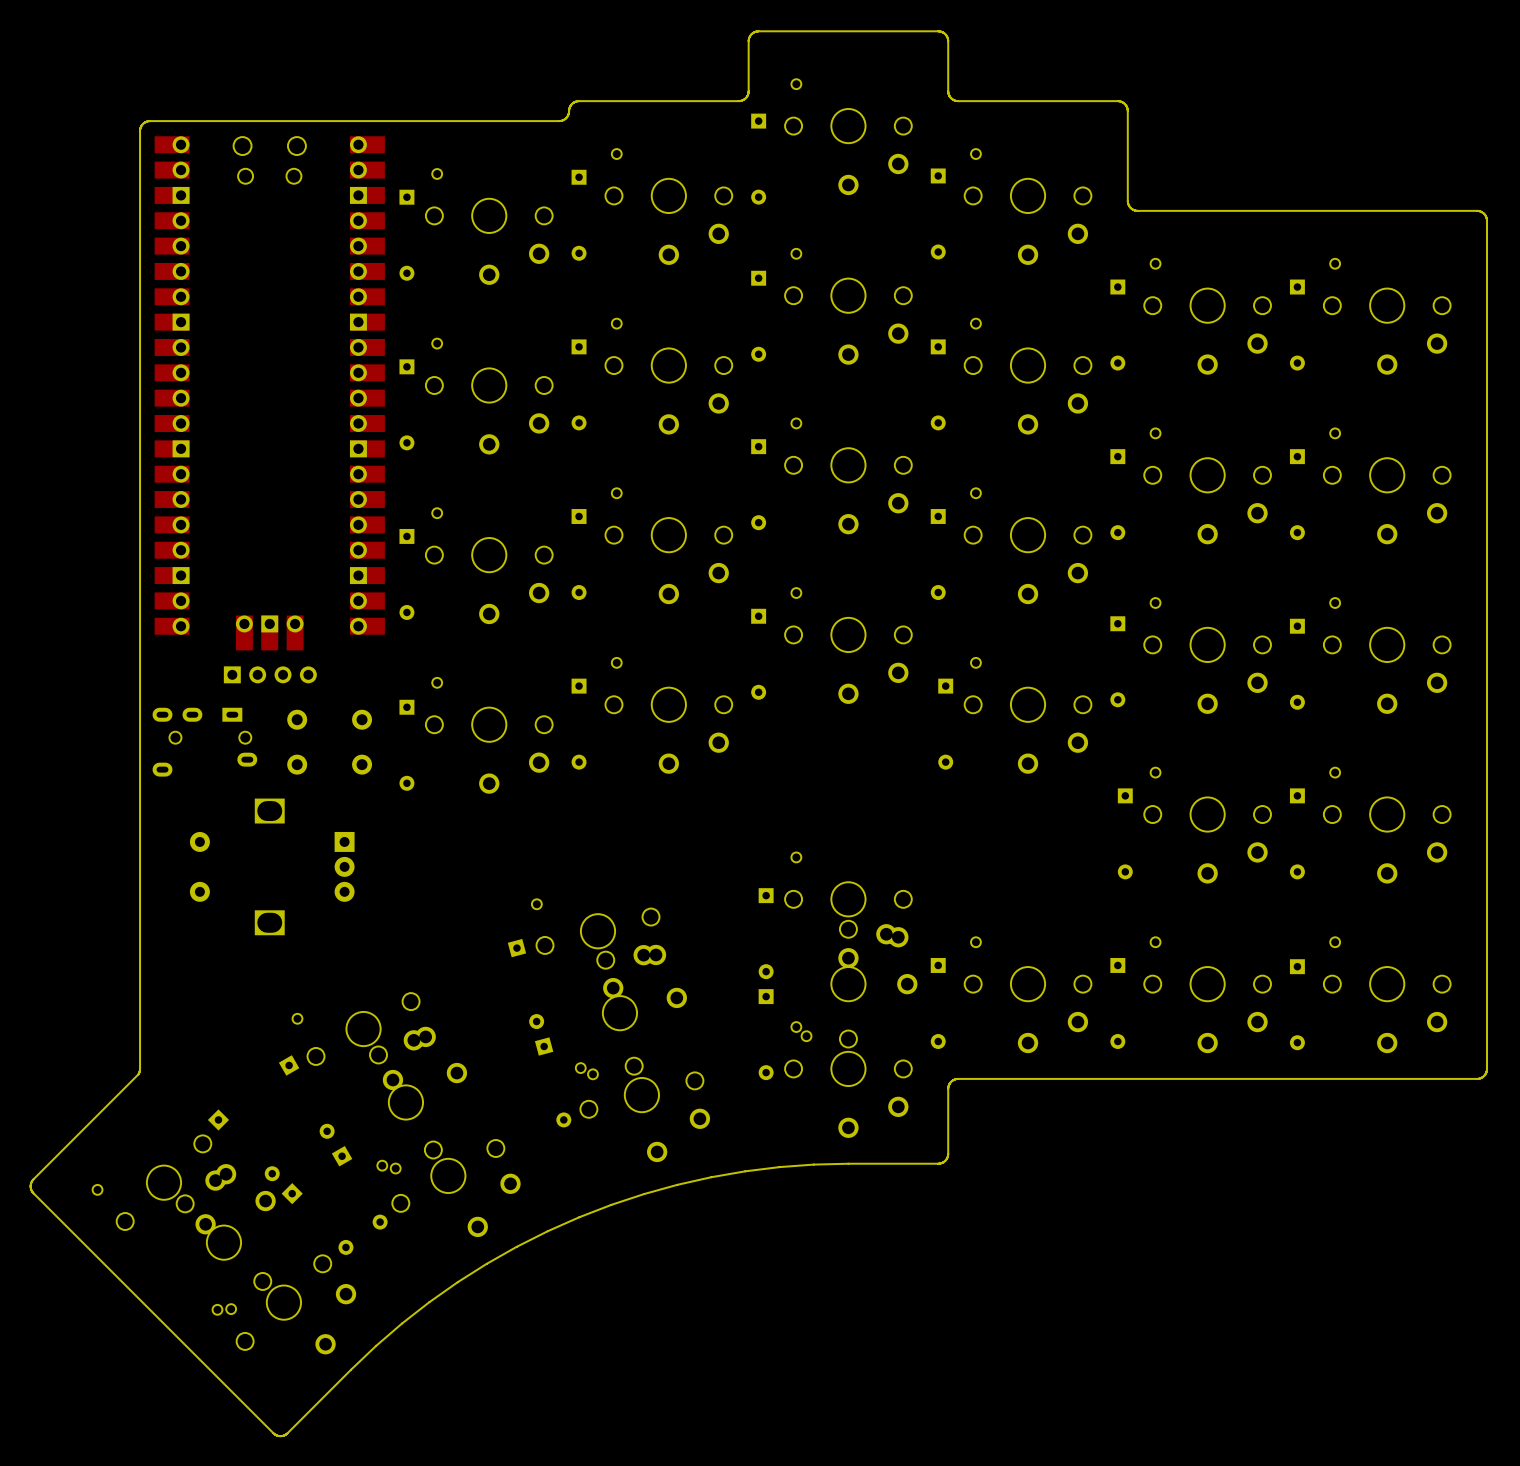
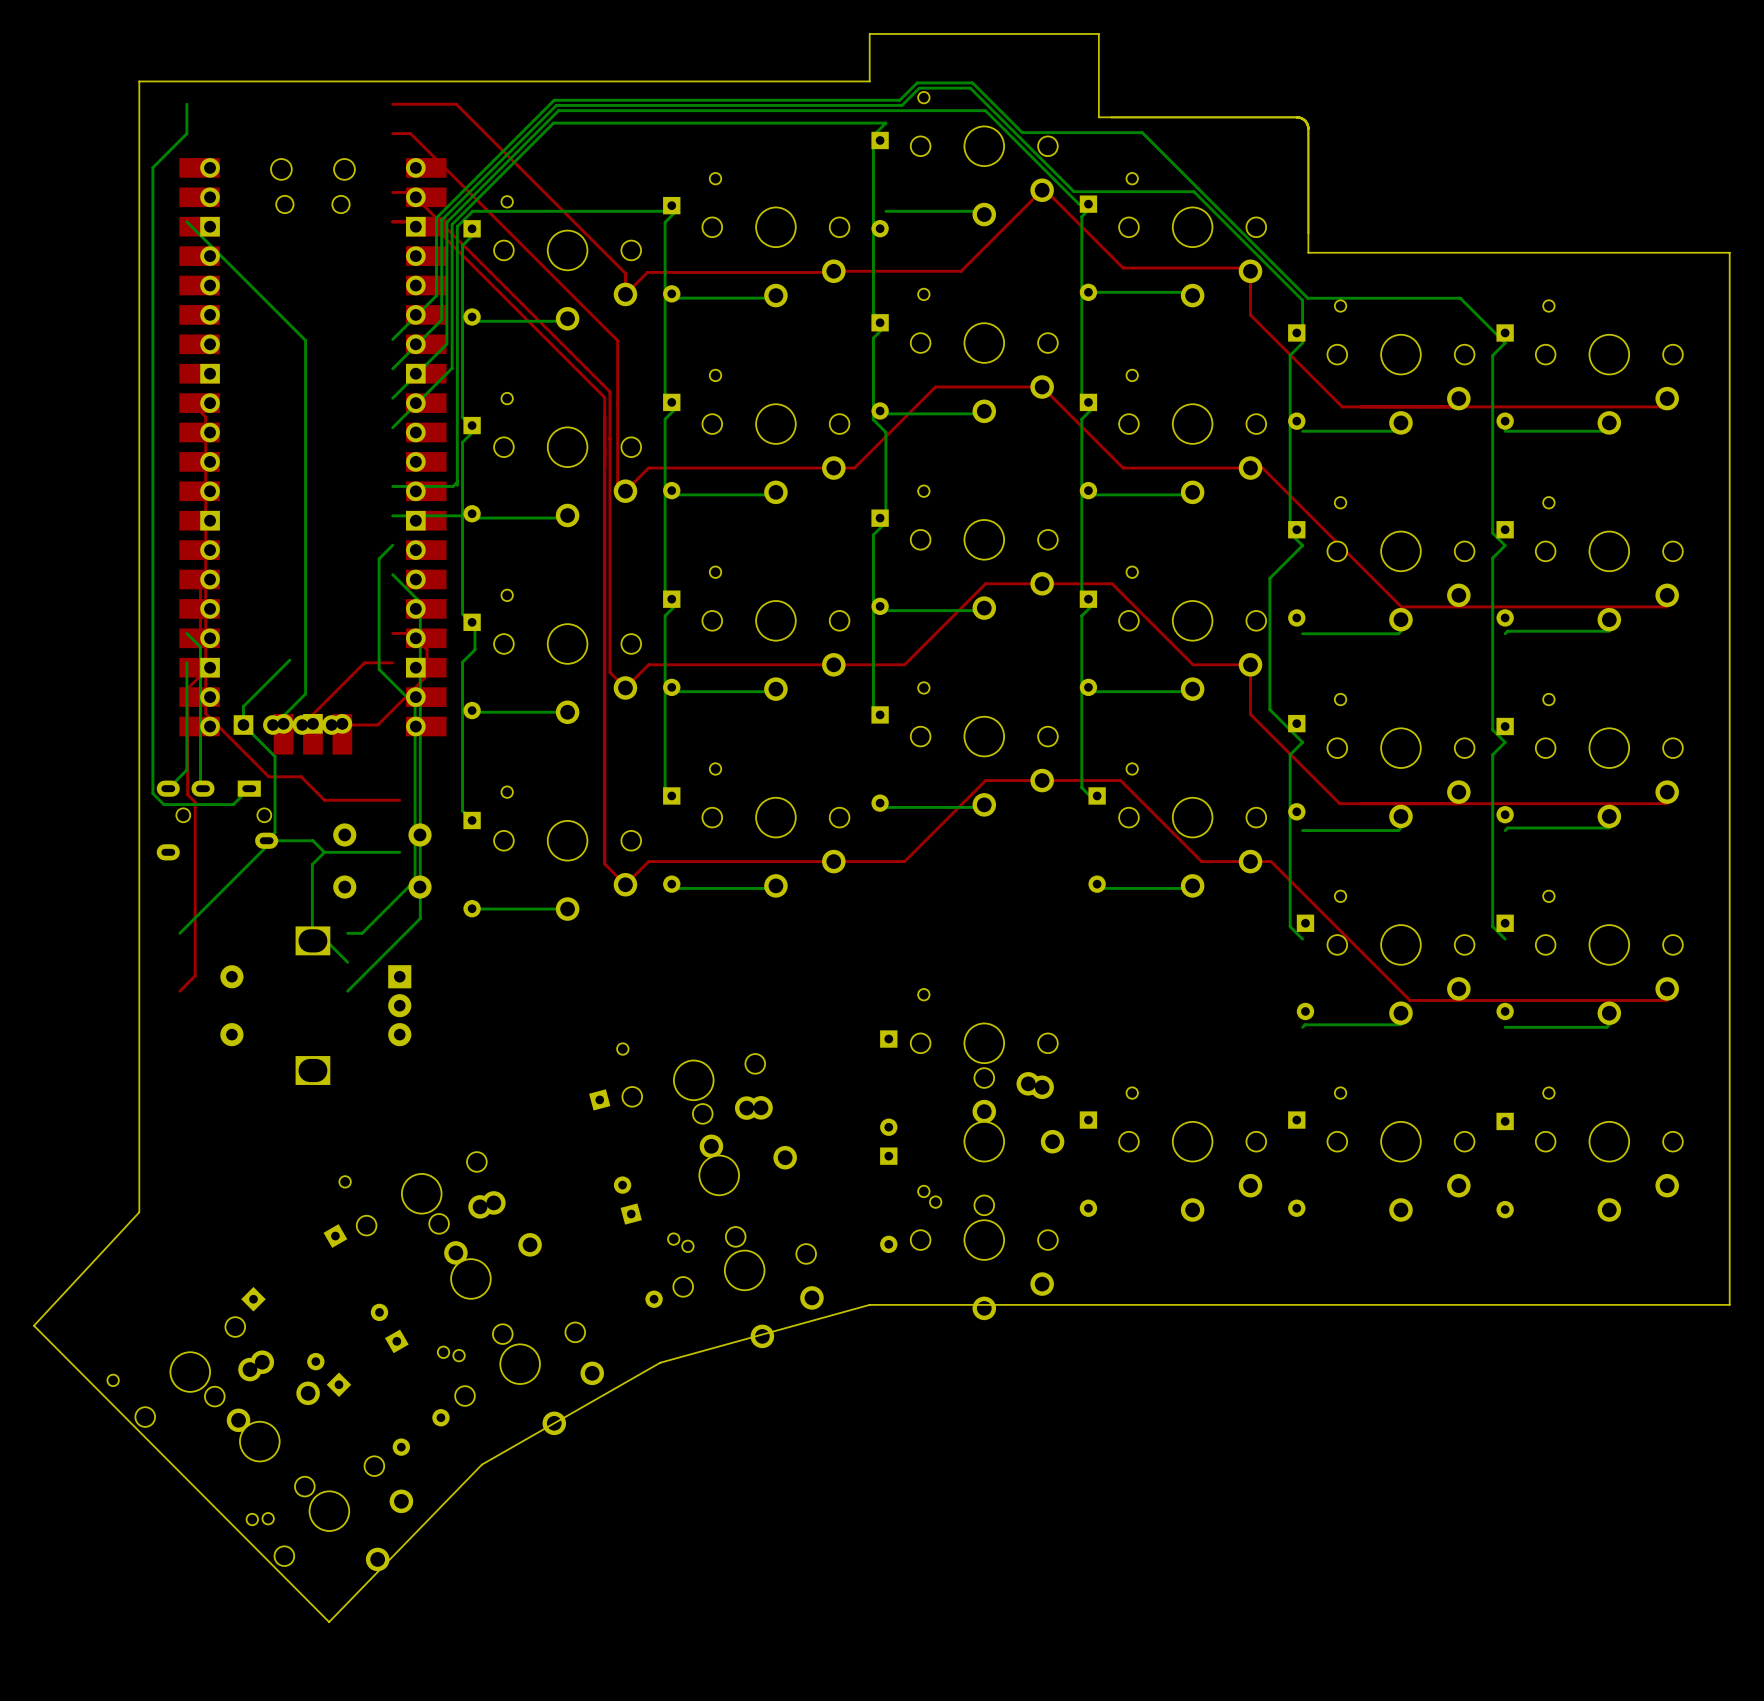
bottom track: none -> (186, 104) (186, 133) (152, 167) (152, 793) (163, 804) (233, 804) (249, 788)
top track: none -> (392, 104) (456, 104) (625, 273) (625, 294) (647, 272) (833, 272)
board edge: (958, 101) (951, 98) (948, 93) (948, 40) (946, 35) (941, 31) (758, 31) (752, 33) (748, 38) (748, 92) (745, 98) (740, 101) (578, 101) (570, 105) (566, 117) (559, 121) (150, 121) (141, 126) (140, 1069) (138, 1074) (33, 1179) (30, 1187) (33, 1193) (275, 1434) (281, 1436) (287, 1433) (376, 1345) (429, 1302) (457, 1282) (516, 1246) (579, 1217) (644, 1194) (677, 1184) (745, 1171) (813, 1164) (942, 1162) (948, 1154) (948, 1087) (950, 1082) (955, 1079) (1477, 1078) (1485, 1074) (1486, 1068) (1486, 217) (1482, 212) (1477, 210) (1137, 210) (1130, 207) (1127, 200) -> (1111, 117) (1098, 117) (1098, 33) (869, 33) (869, 81) (139, 81) (139, 1212) (33, 1325) (329, 1622) (481, 1464) (660, 1362) (869, 1304) (1729, 1304) (1729, 252) (1308, 252) (1308, 233)
top track: none -> (392, 133) (410, 133) (617, 340) (617, 483) (625, 491) (648, 468) (854, 468) (935, 387) (1042, 387) (1123, 468) (1262, 468) (1401, 606) (1667, 606)
top track: none -> (1042, 187) (1123, 268) (1250, 268) (1250, 315) (1342, 406) (1667, 406)
top track: none -> (1042, 190) (961, 271) (833, 271)
top track: none -> (392, 192) (410, 192) (609, 391) (609, 672) (625, 687) (648, 664) (904, 664) (985, 583) (1112, 583) (1193, 664) (1250, 664) (1250, 714) (1339, 803) (1667, 803)
bottom track: none -> (677, 209) (665, 222) (665, 394) (677, 406) (665, 419) (665, 591) (677, 603) (665, 615) (665, 787) (677, 800)
bottom track: none -> (676, 211) (472, 211) (457, 226) (457, 485)
bottom track: none -> (984, 211) (885, 211)
bottom track: none -> (186, 221) (305, 340) (305, 693) (272, 725)
top track: none -> (392, 221) (429, 221) (604, 397) (604, 864) (625, 884) (648, 861) (904, 861) (985, 780) (1120, 780) (1201, 861) (1271, 861) (1410, 1000) (1667, 1000)
bottom track: none -> (474, 233) (462, 245) (462, 417) (474, 429) (462, 442) (462, 614) (474, 626) (474, 649) (462, 662) (462, 810) (474, 823)
bottom track: none -> (1192, 292) (1094, 292)
bottom track: none -> (775, 296) (677, 298)
bottom track: none -> (567, 318) (565, 321) (474, 321)
bottom track: none -> (392, 339) (436, 295) (436, 217) (554, 100) (899, 100) (917, 82) (972, 82) (1022, 132) (1142, 132) (1307, 298) (1460, 298) (1505, 343) (1492, 355) (1492, 533) (1505, 545) (1492, 558) (1492, 729) (1505, 742) (1492, 754) (1492, 926) (1505, 939)
bottom track: none -> (392, 368) (441, 319) (441, 220) (556, 105) (901, 105) (919, 88) (970, 88) (1073, 191) (1193, 191) (1302, 300) (1302, 343) (1290, 355) (1290, 533) (1302, 545) (1269, 578) (1269, 709) (1302, 742) (1290, 754) (1290, 926) (1302, 939)
top track: none -> (186, 398) (205, 417) (205, 713) (268, 776) (301, 776) (324, 800) (399, 800)
bottom track: none -> (392, 398) (446, 344) (446, 222) (558, 110) (985, 110) (1079, 204) (1094, 204) (1081, 216) (1081, 394) (1094, 406) (1081, 419) (1081, 591) (1094, 603) (1081, 615) (1081, 787) (1094, 800)
bottom track: none -> (984, 411) (981, 413) (885, 413)
bottom track: none -> (392, 427) (452, 368) (452, 224) (553, 123) (885, 123) (873, 135) (873, 313) (885, 325) (873, 338) (873, 419) (885, 432) (885, 522) (873, 534) (873, 706) (885, 719)
bottom track: none -> (1400, 431) (1302, 431)
bottom track: none -> (1609, 431) (1505, 431)
bottom track: none -> (457, 482) (453, 486) (392, 486)
bottom track: none -> (775, 492) (773, 494) (677, 494)
bottom track: none -> (1192, 492) (1190, 494) (1094, 494)
bottom track: none -> (462, 515) (392, 515)
bottom track: none -> (567, 515) (565, 518) (474, 518)
bottom track: none -> (392, 545) (379, 558) (379, 669) (415, 705) (415, 880) (362, 933) (347, 933)
top track: none -> (186, 574) (200, 588) (200, 675) (187, 688) (187, 794) (195, 802) (195, 975) (179, 991)
bottom track: none -> (392, 574) (420, 602) (420, 918) (347, 991)
bottom track: none -> (984, 608) (981, 610) (885, 610)
bottom track: none -> (1400, 631) (1398, 633) (1302, 633)
bottom track: none -> (1609, 631) (1507, 631) (1505, 633)
bottom track: none -> (186, 633) (200, 647) (200, 786) (202, 788)
top track: none -> (392, 633) (410, 633) (427, 650) (427, 675) (377, 725) (331, 725)
bottom track: none -> (289, 660) (243, 706) (243, 725) (275, 756) (275, 832) (266, 840)
bottom track: none -> (186, 662) (186, 770) (168, 788)
top track: none -> (392, 662) (364, 662) (302, 725)
bottom track: none -> (775, 689) (773, 691) (677, 691)
bottom track: none -> (1192, 689) (1190, 691) (1094, 691)
bottom track: none -> (567, 712) (477, 712) (474, 714)
part position: (270, 674) -> (287, 725)
bottom track: none -> (984, 804) (981, 807) (885, 807)
bottom track: none -> (1400, 828) (1398, 830) (1302, 830)
bottom track: none -> (1609, 828) (1507, 828) (1505, 830)
bottom track: none -> (266, 840) (312, 840) (324, 852)
bottom track: none -> (266, 840) (266, 846) (179, 933)
bottom track: none -> (324, 852) (312, 864) (312, 926) (347, 962)
bottom track: none -> (399, 852) (324, 852)
part position: (204, 742) -> (217, 820)
bottom track: none -> (775, 885) (773, 888) (677, 888)
bottom track: none -> (1192, 885) (1190, 888) (1094, 888)
bottom track: none -> (567, 909) (477, 909) (474, 911)
bottom track: none -> (1400, 1024) (1305, 1024) (1302, 1027)
bottom track: none -> (1609, 1024) (1606, 1027) (1505, 1027)

